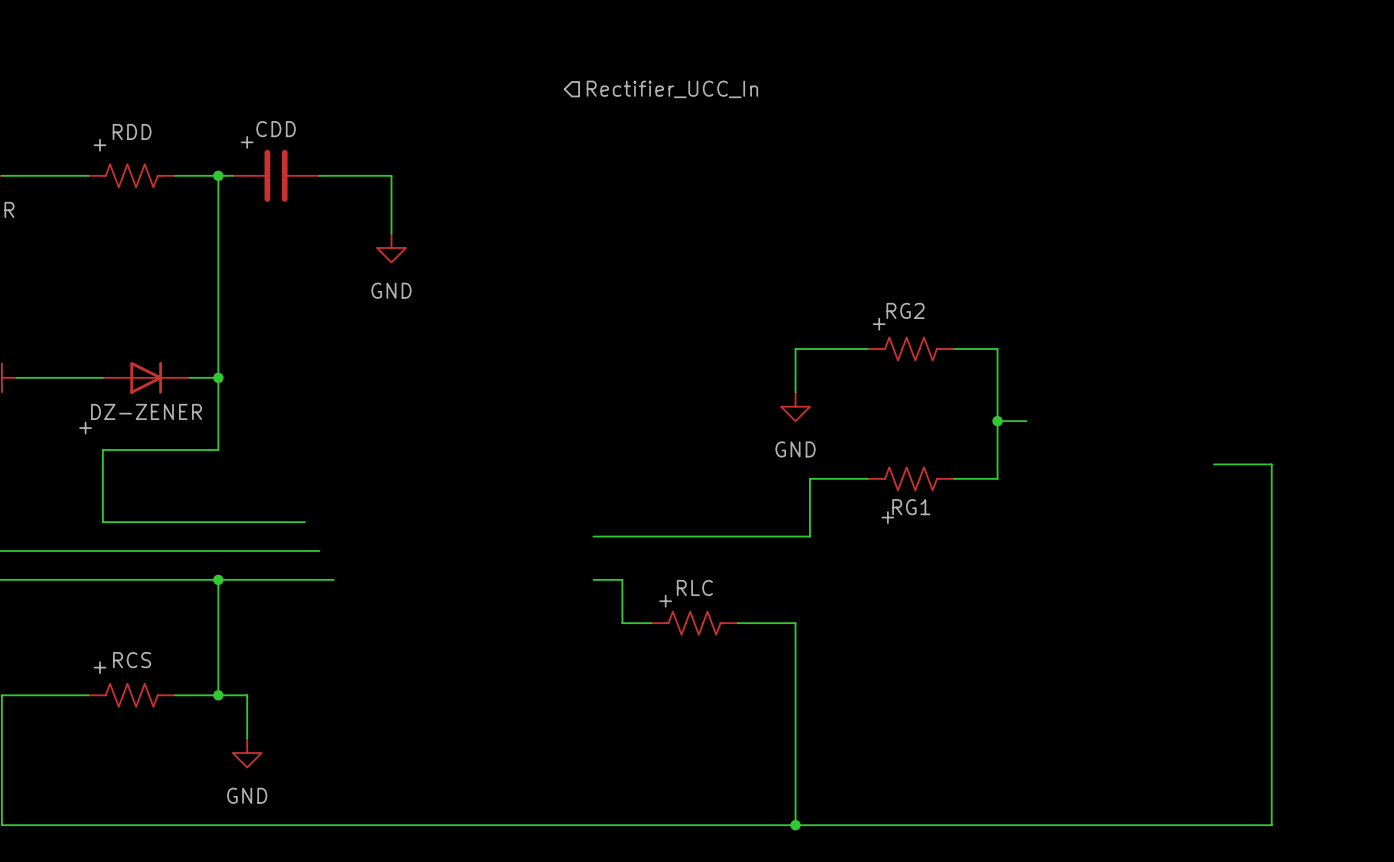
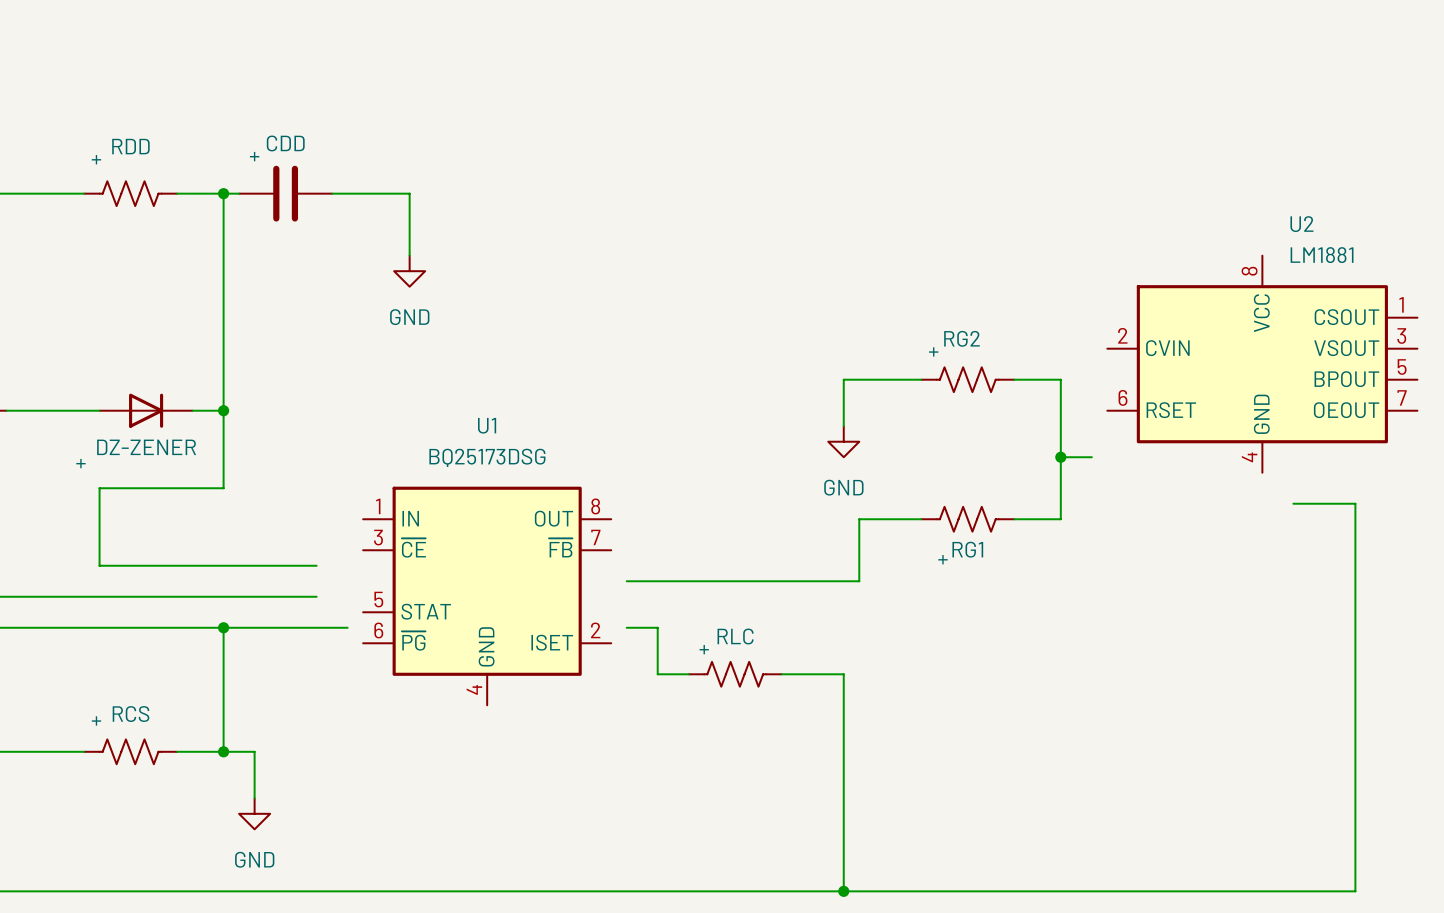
hierarchical label: Rectifier_UCC_In (672, 89) -> none
U2: none -> LM1881 (1262, 364)
U1: none -> BQ25173DSG (487, 595)
wire: (304, 551) (319, 551) -> none

